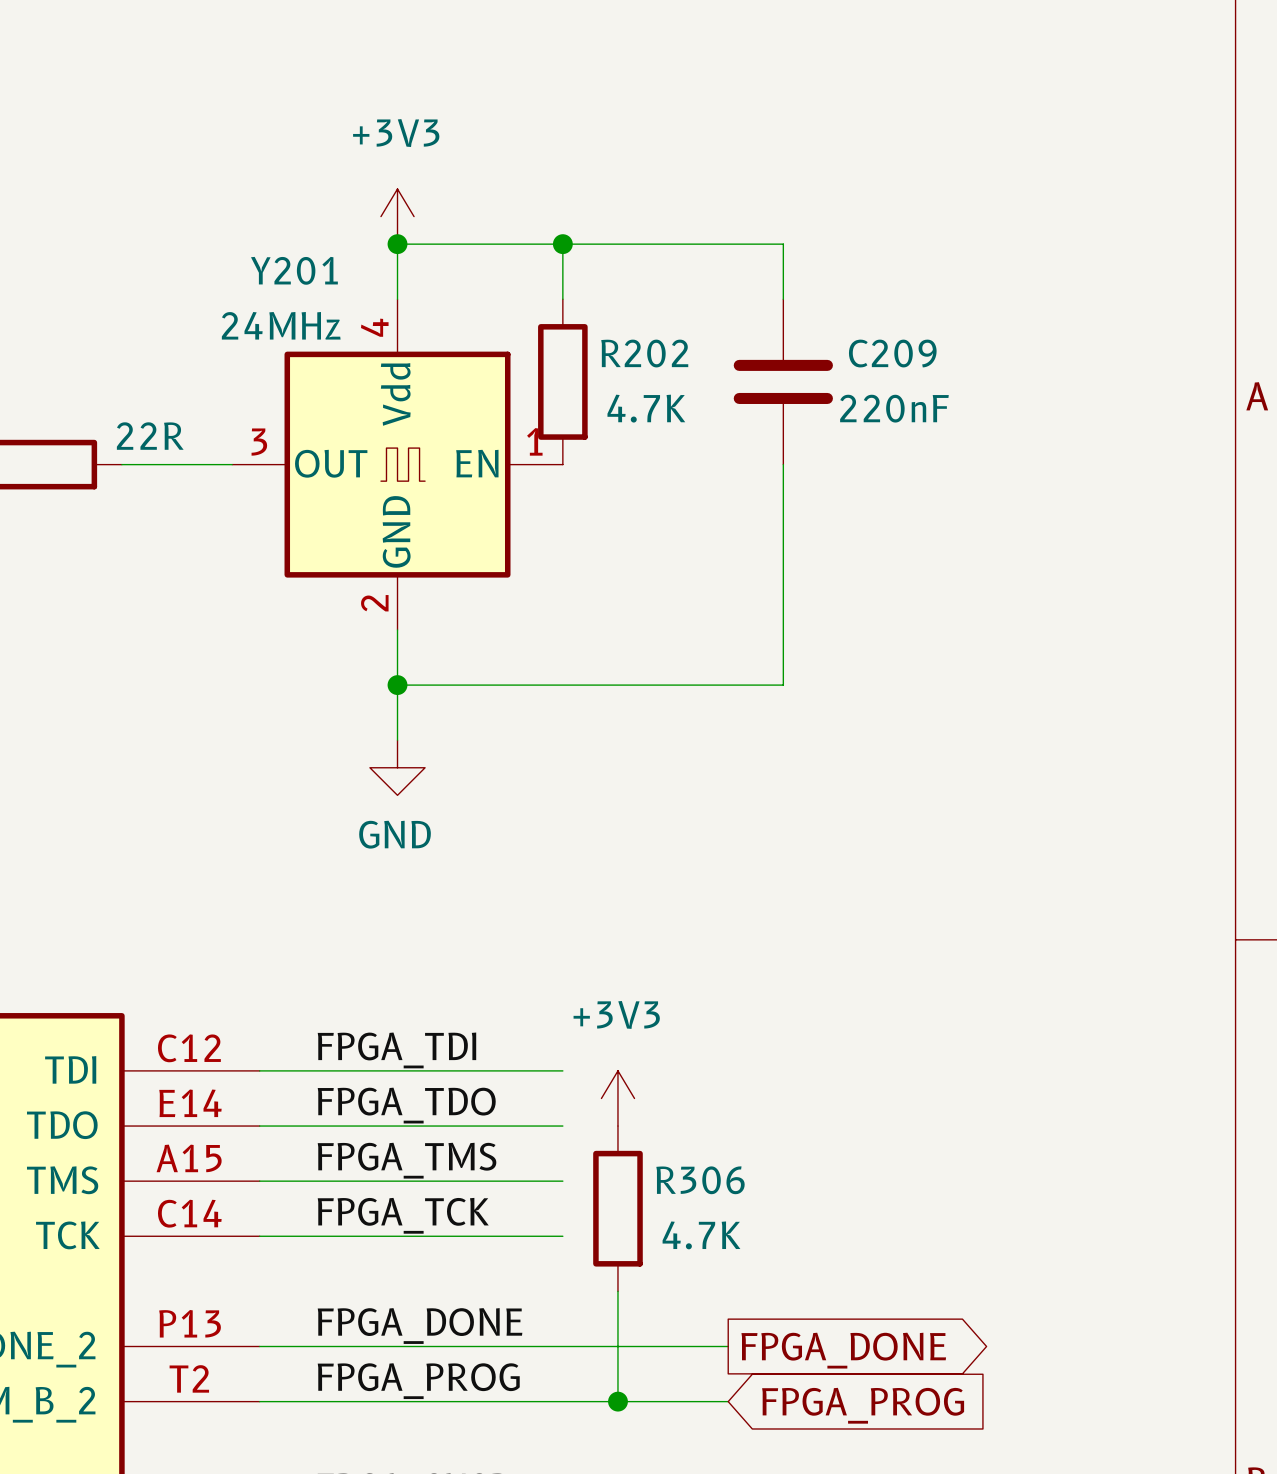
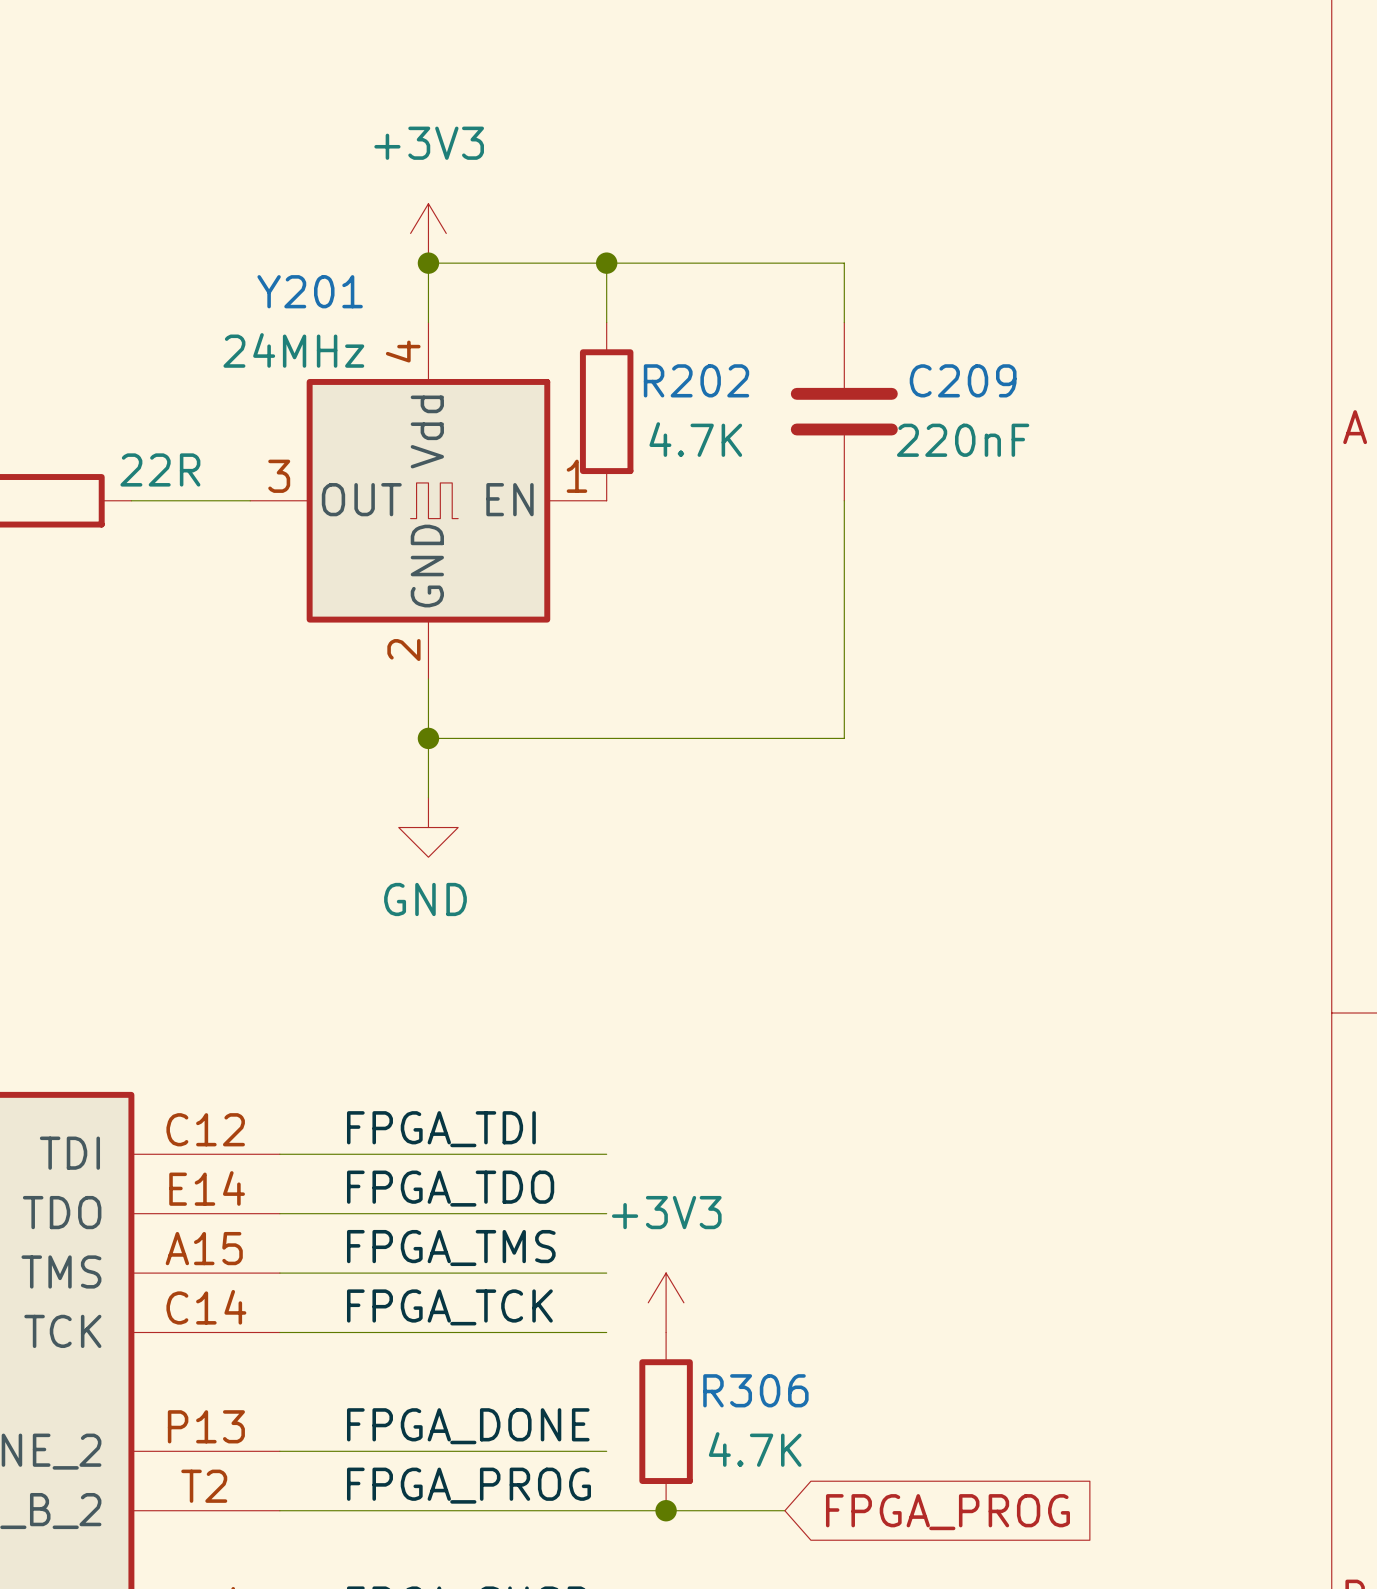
power symbol position: +3V3 (617, 1098) -> +3V3 (666, 1302)
R306 position: (617, 1208) -> (666, 1421)
wire: (617, 1291) (617, 1401) -> none
wire: (562, 1346) (728, 1346) -> none
global label: FPGA_DONE (843, 1350) -> none

